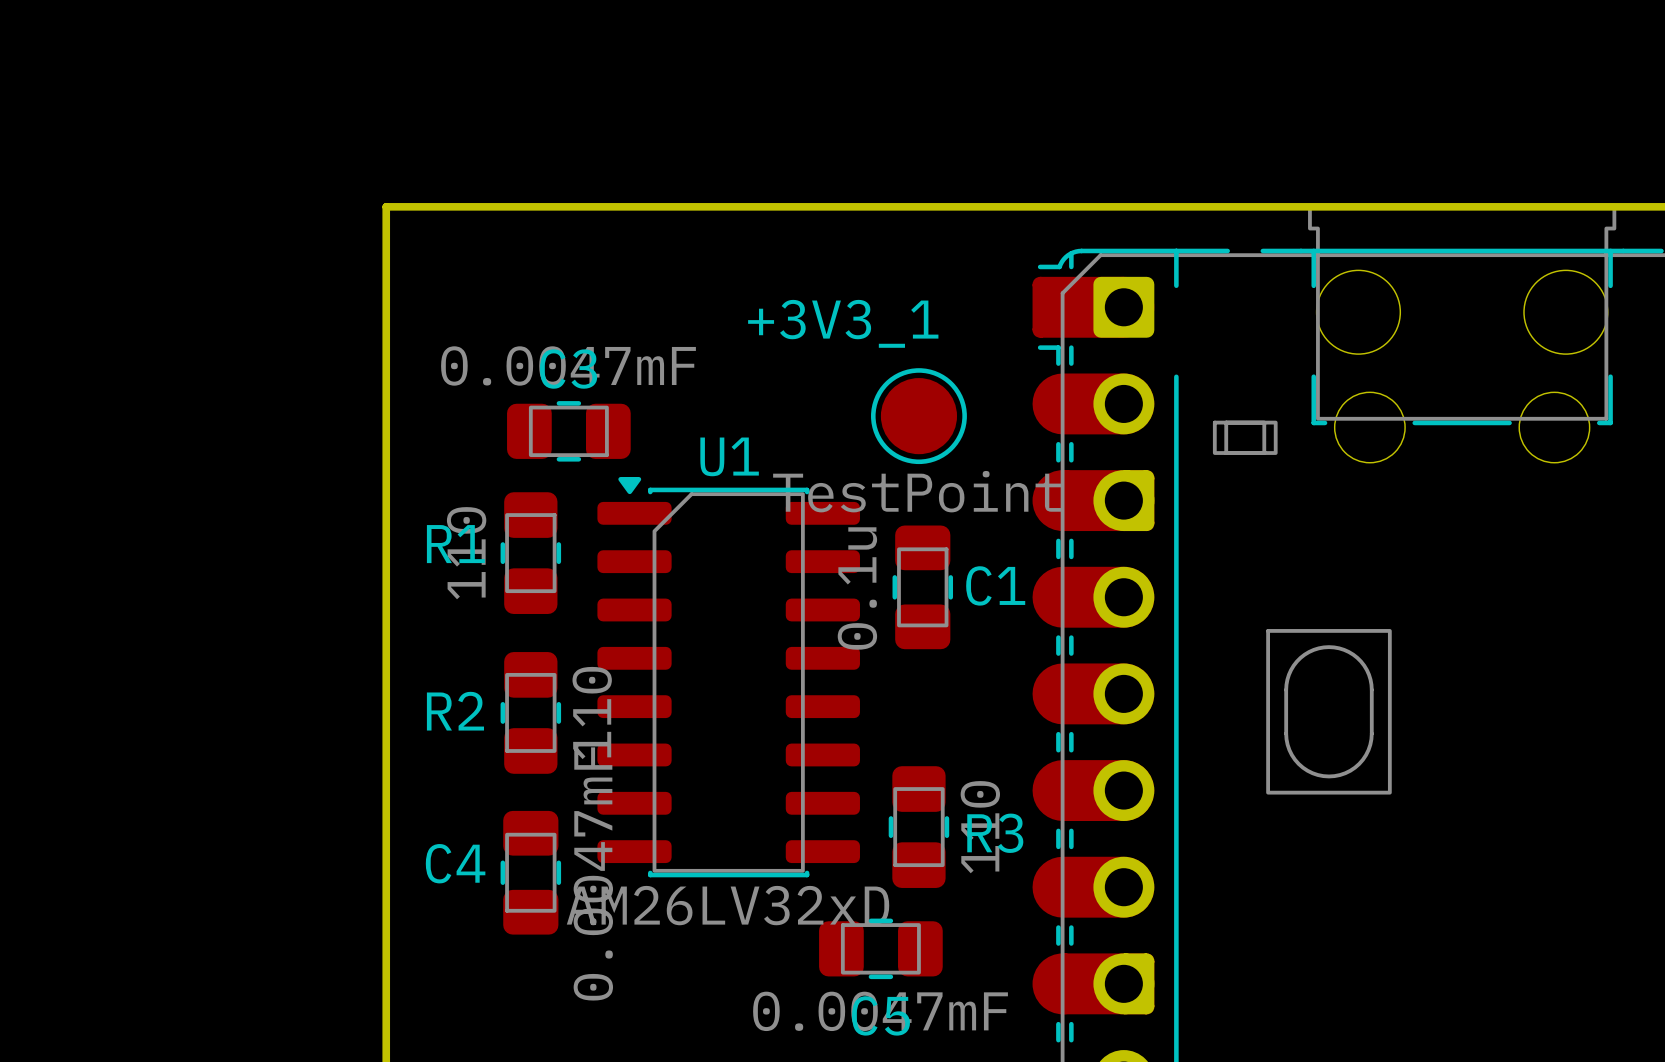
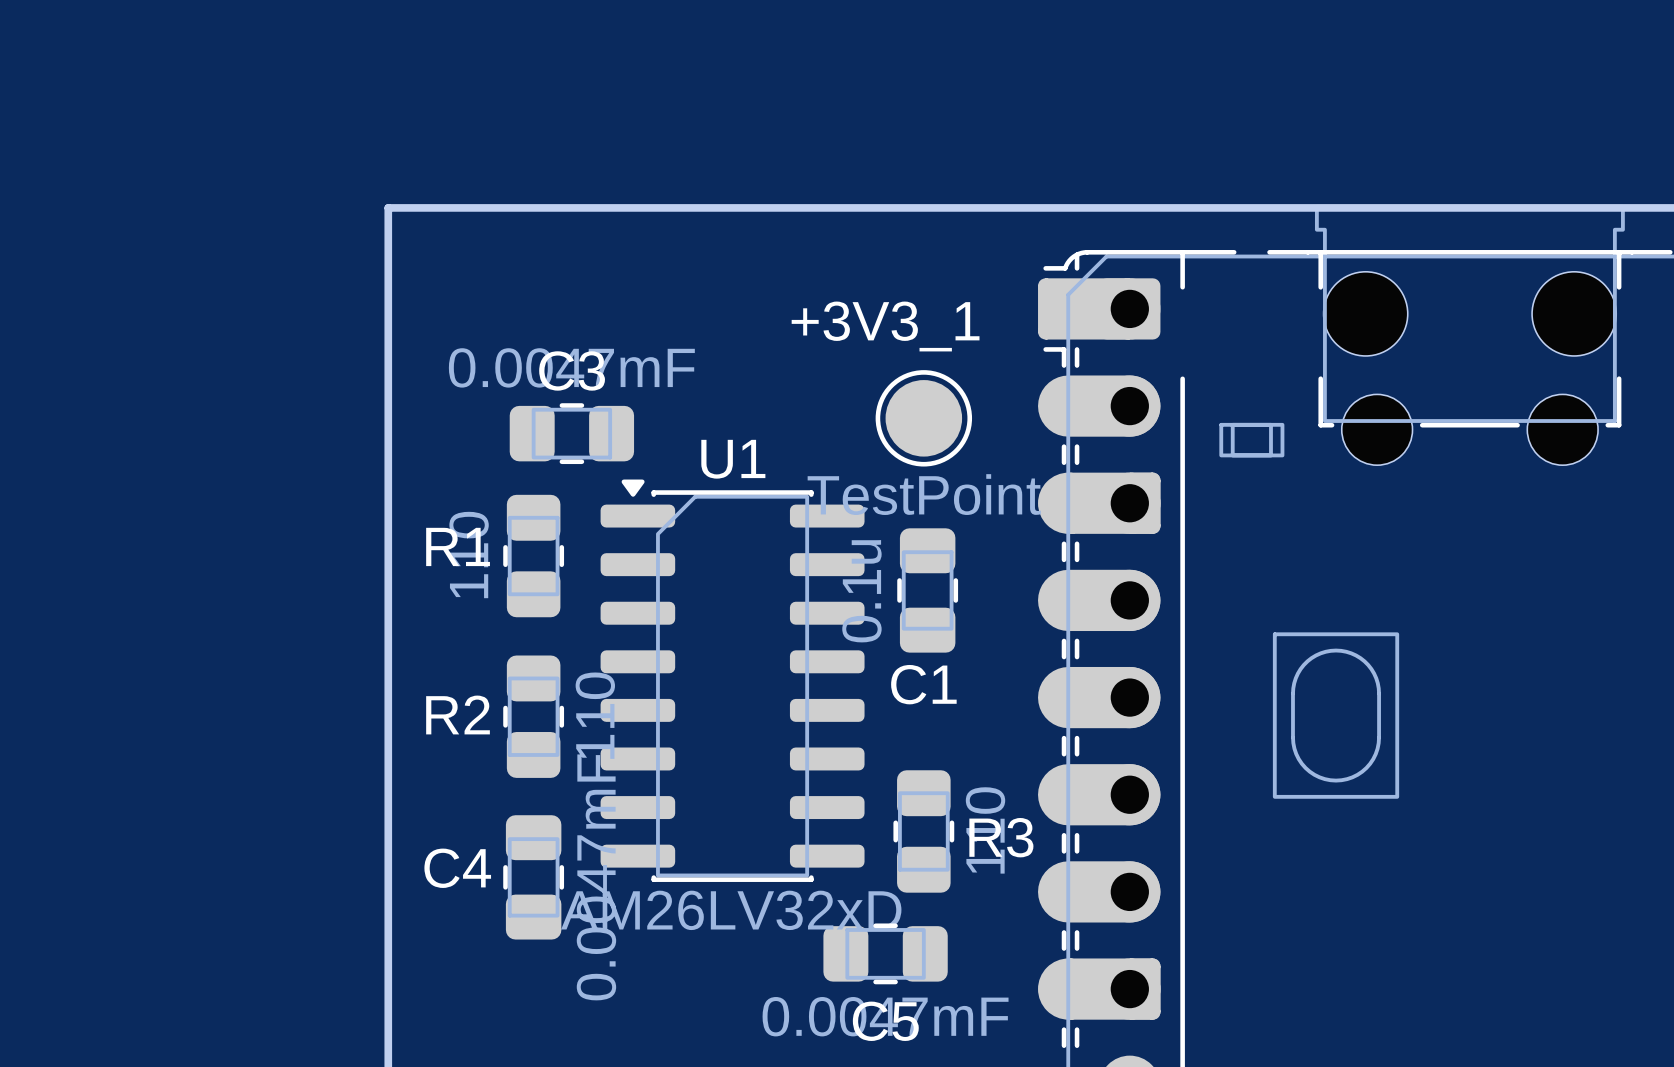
+3V3_1 name position: +3V3_1 (843, 323) -> +3V3_1 (885, 326)
C1 name position: C1 (995, 585) -> C1 (923, 684)

